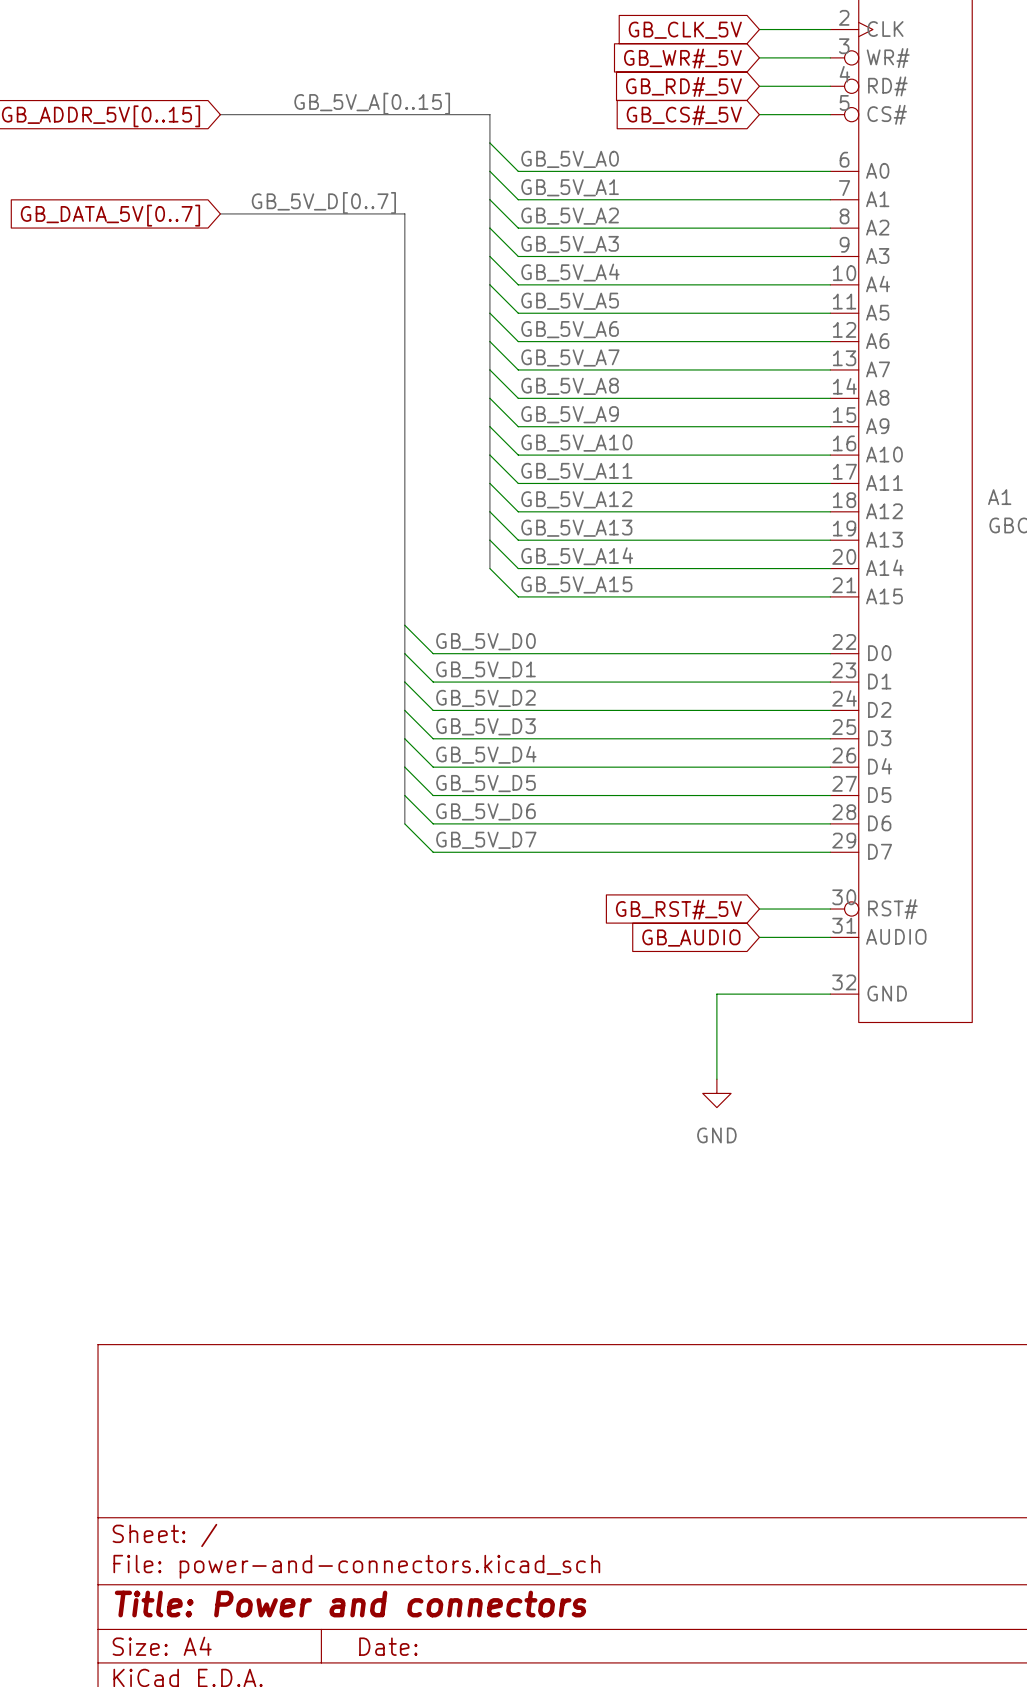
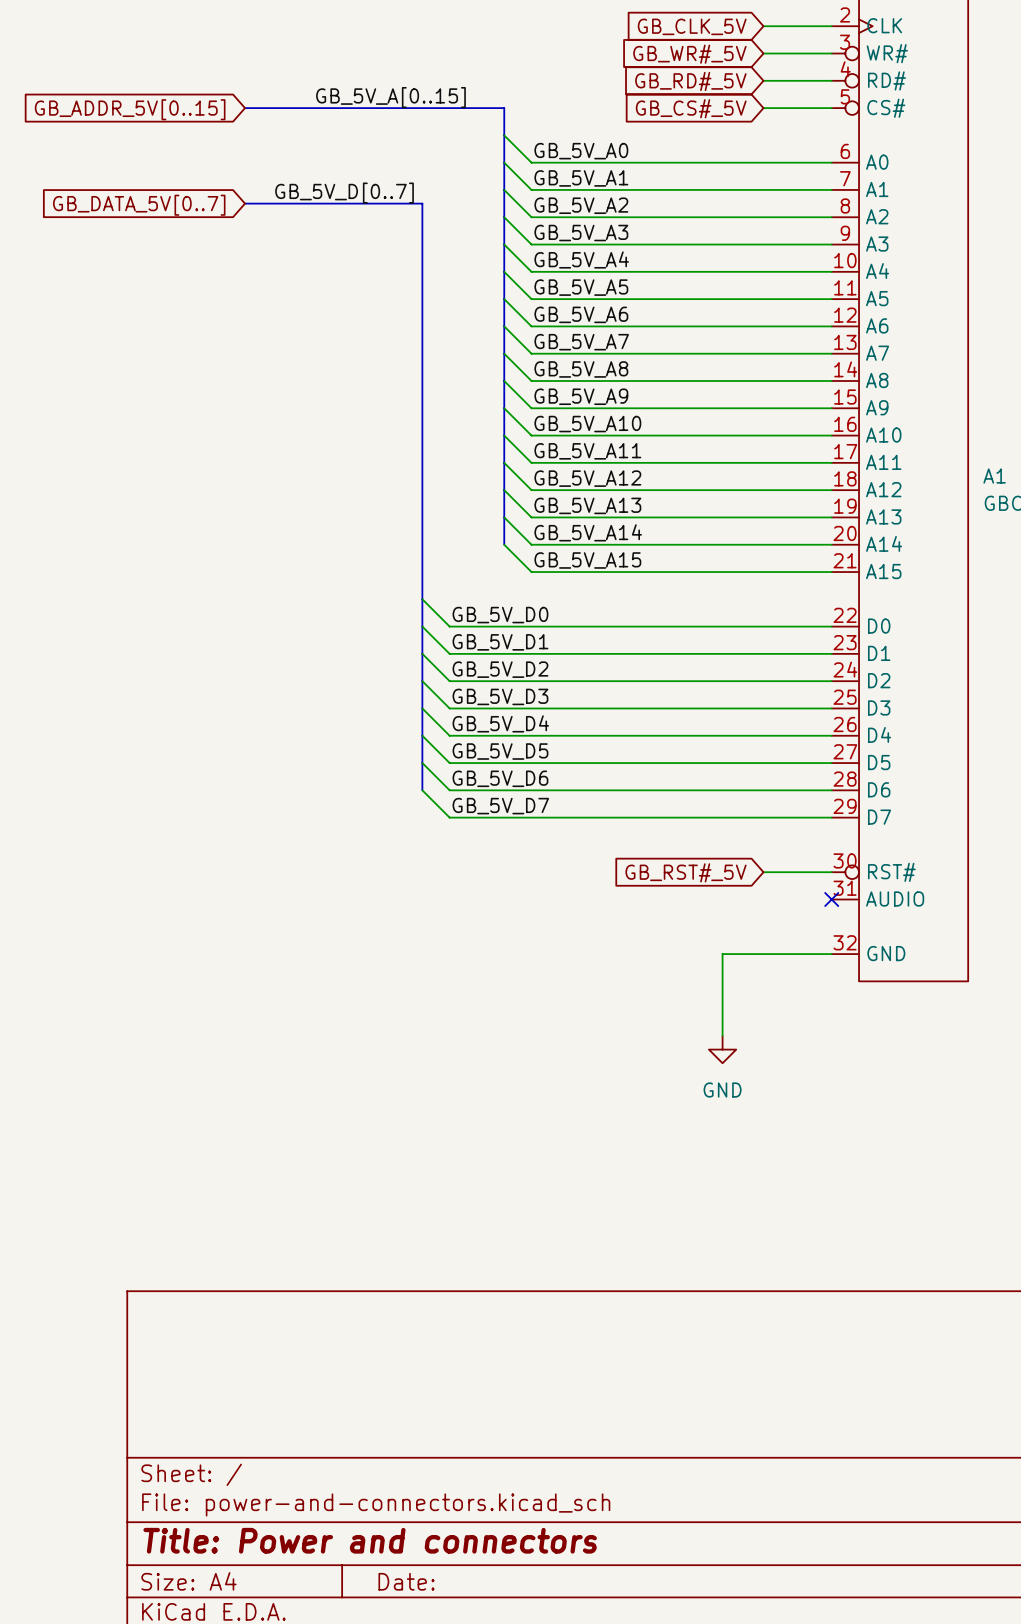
wire: (759, 937) (830, 937) -> none
no-connect mark: none -> (831, 899)
global label: GB_AUDIO (691, 938) -> none

